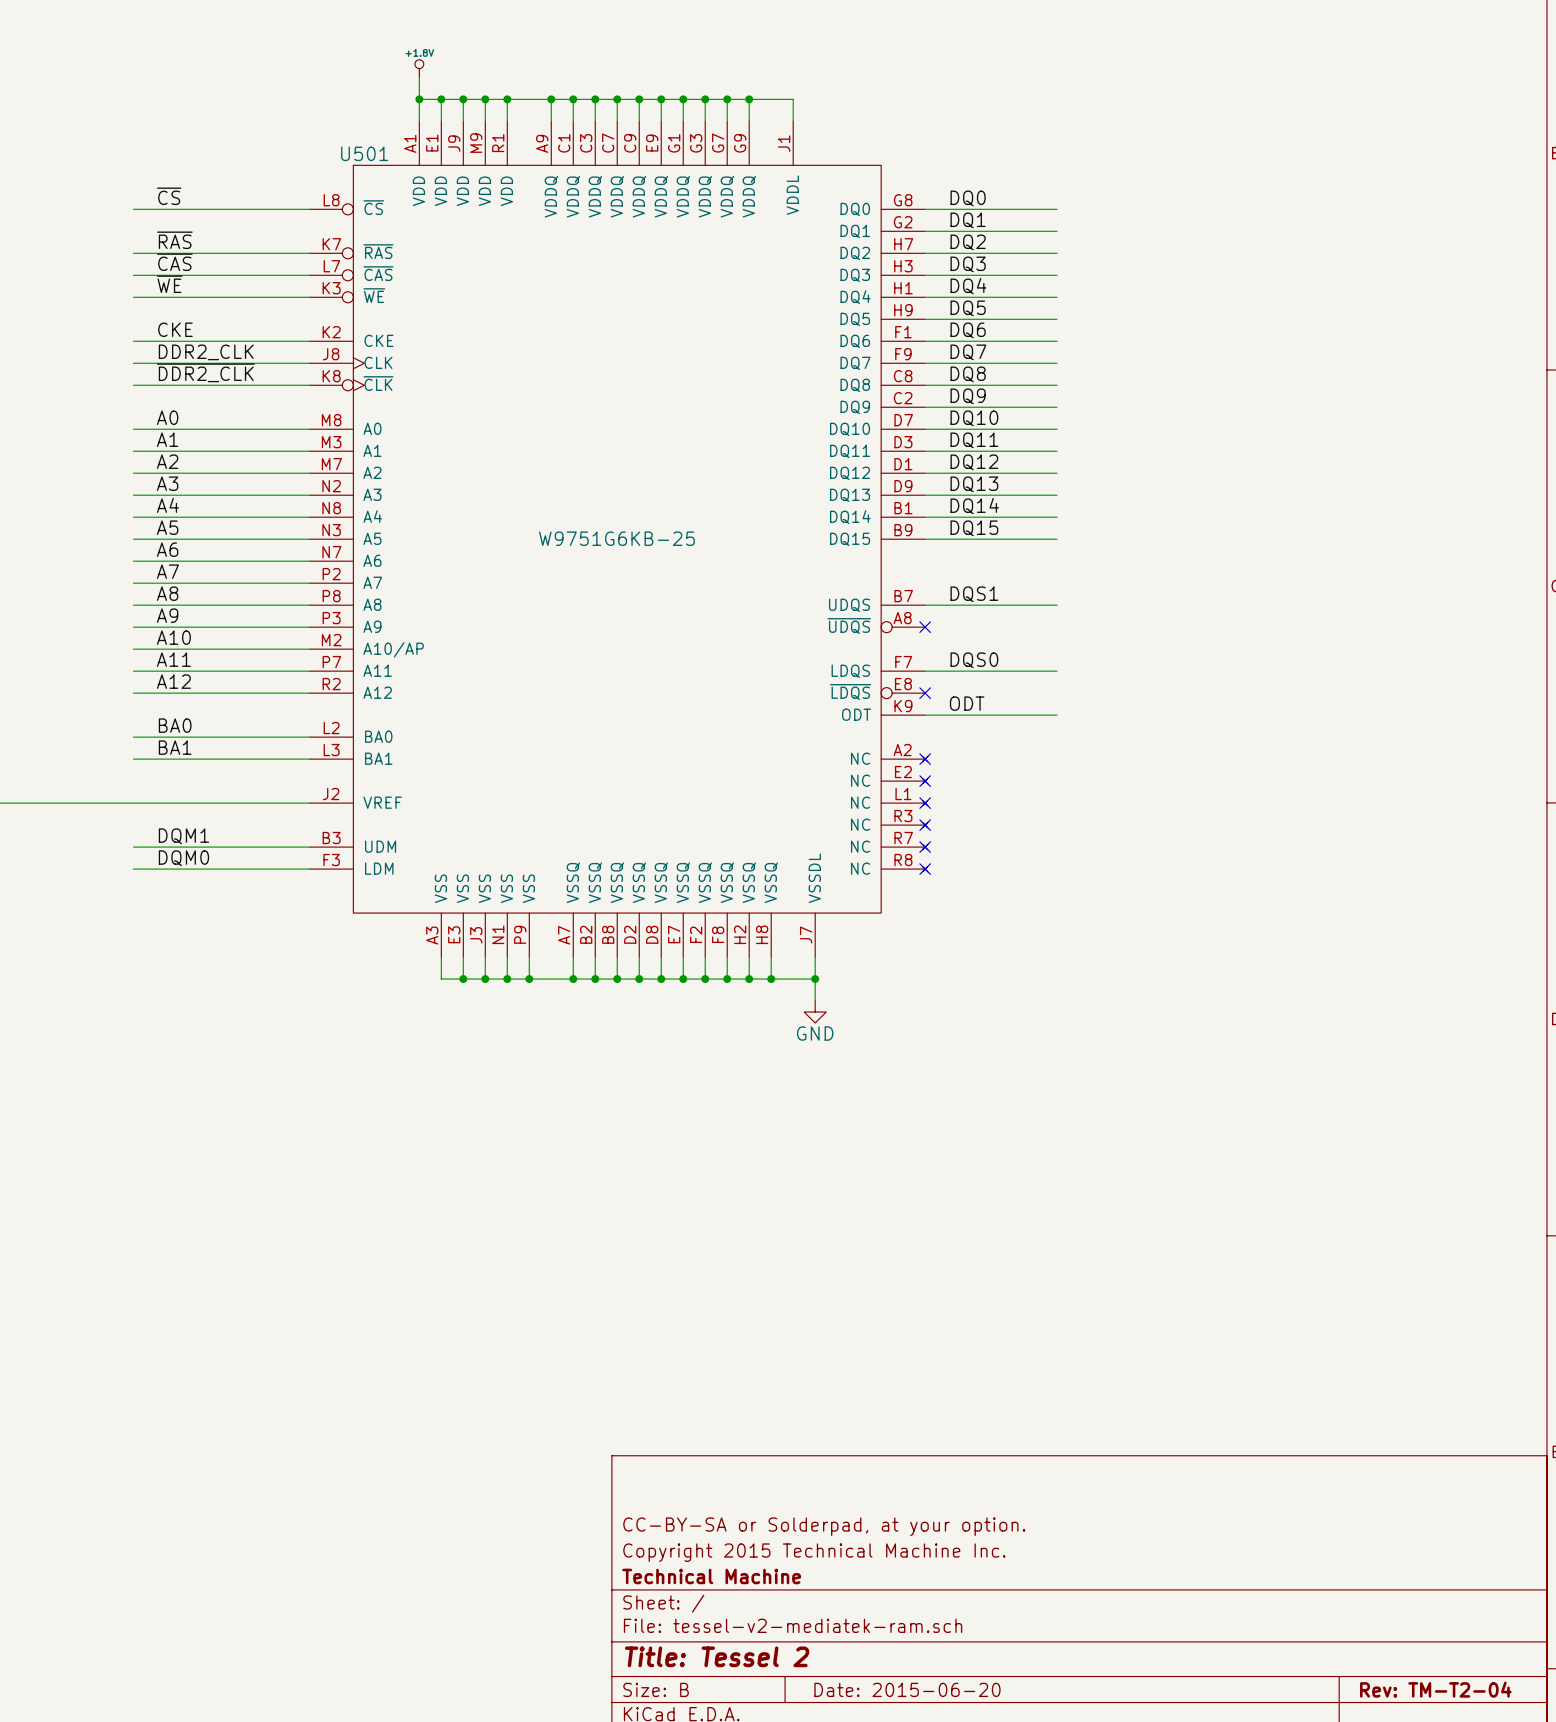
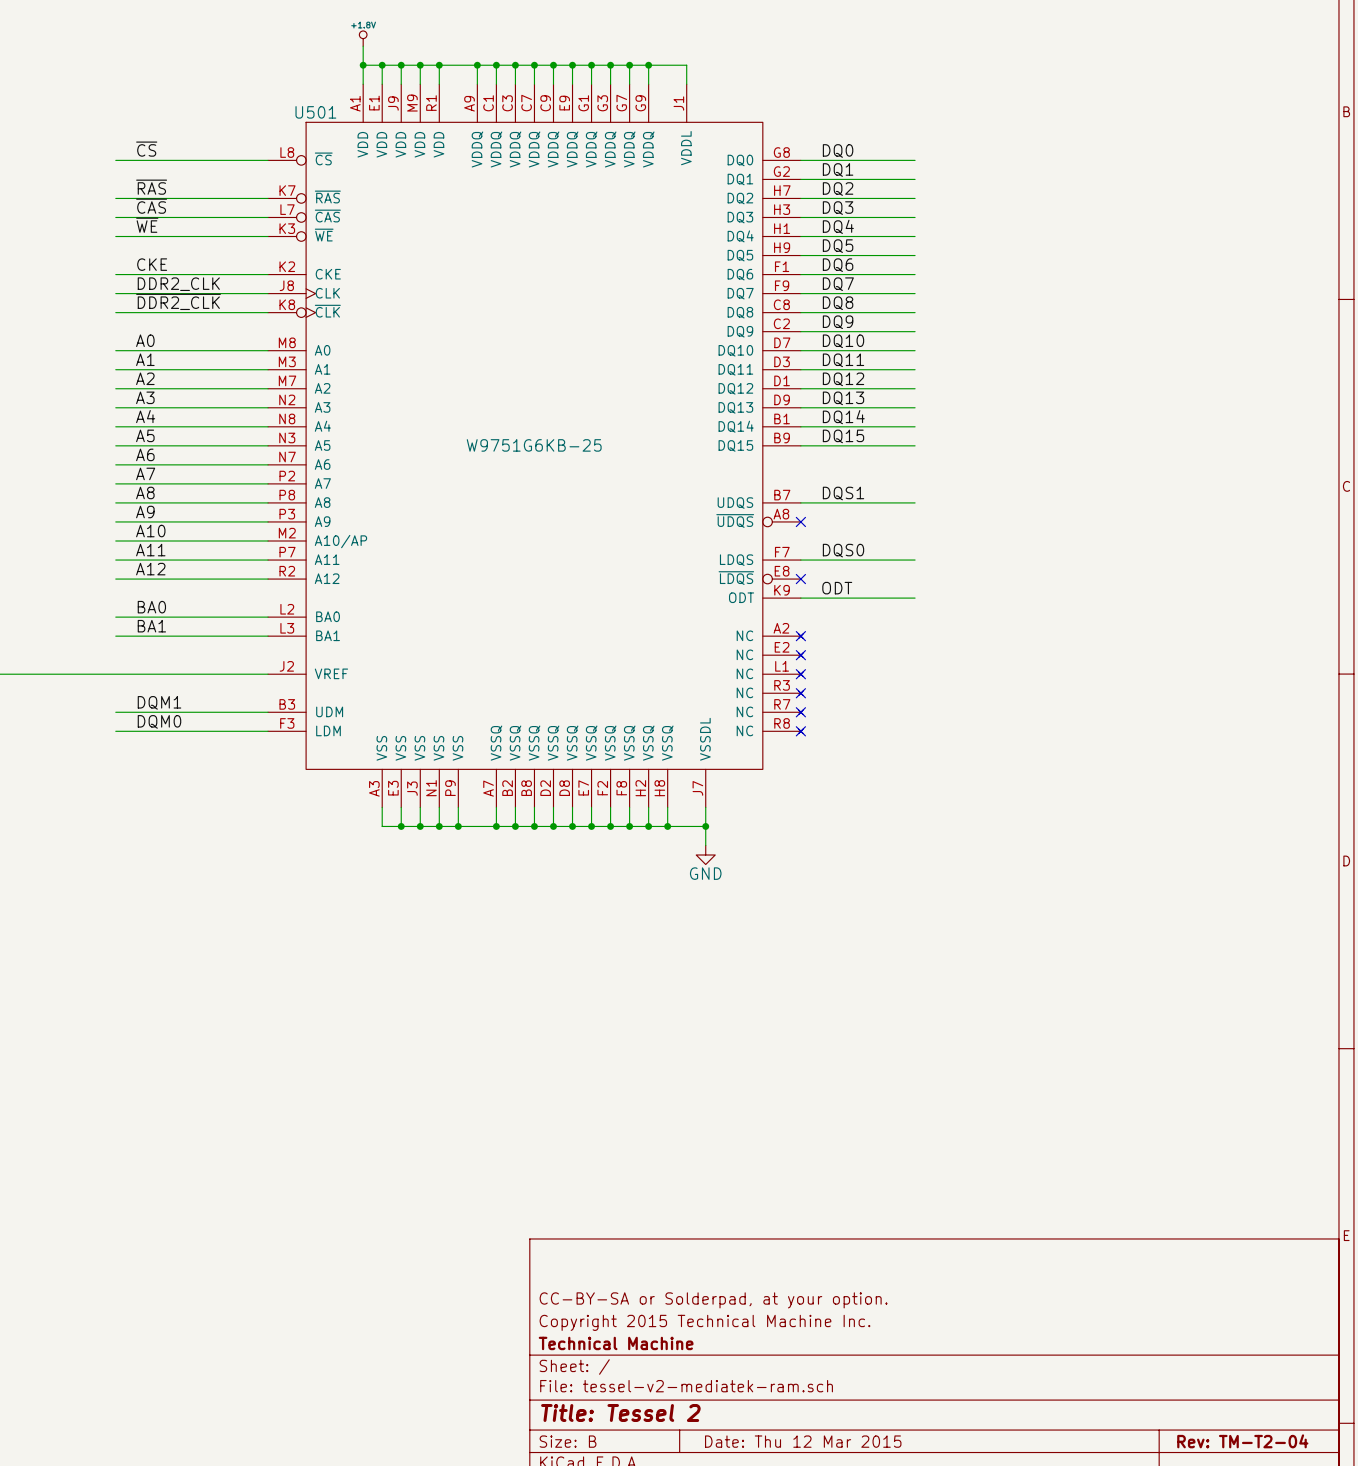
title block: Date: 2015-06-20 (907, 1689) -> Date: Thu 12 Mar 2015 (803, 1441)

